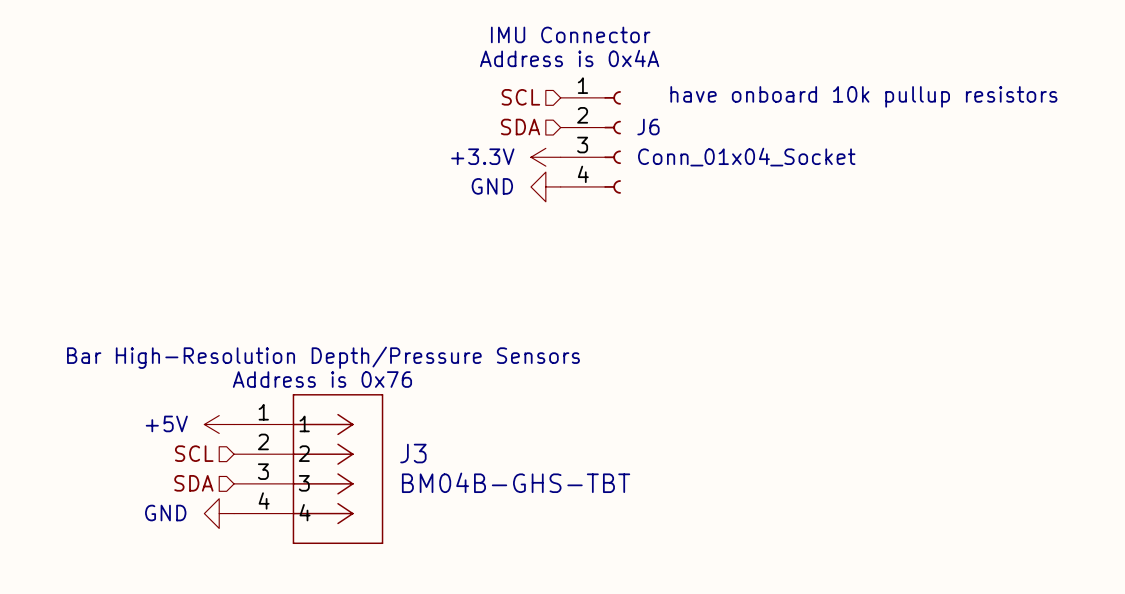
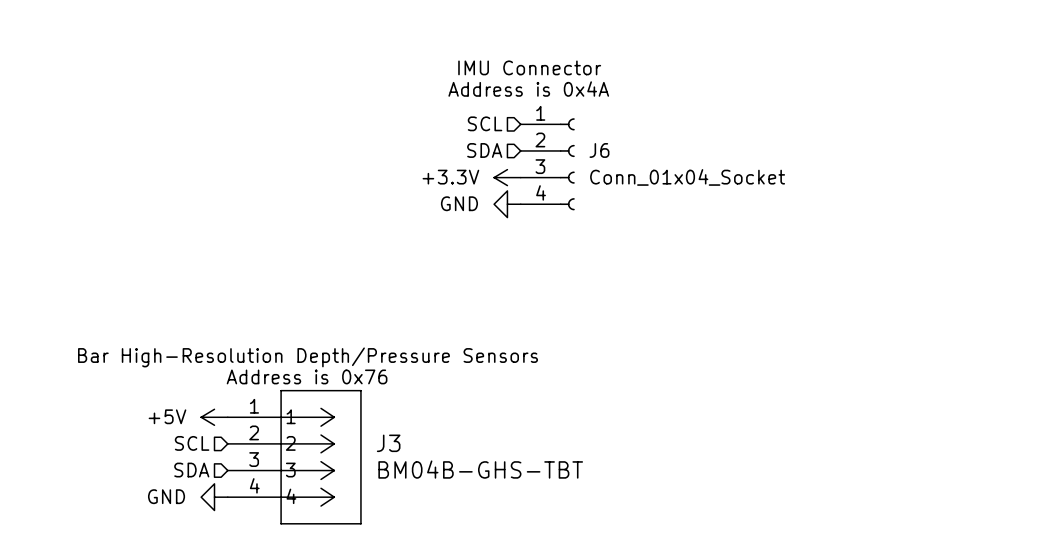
text: have onboard 10k pullup resistors (863, 96) -> none

